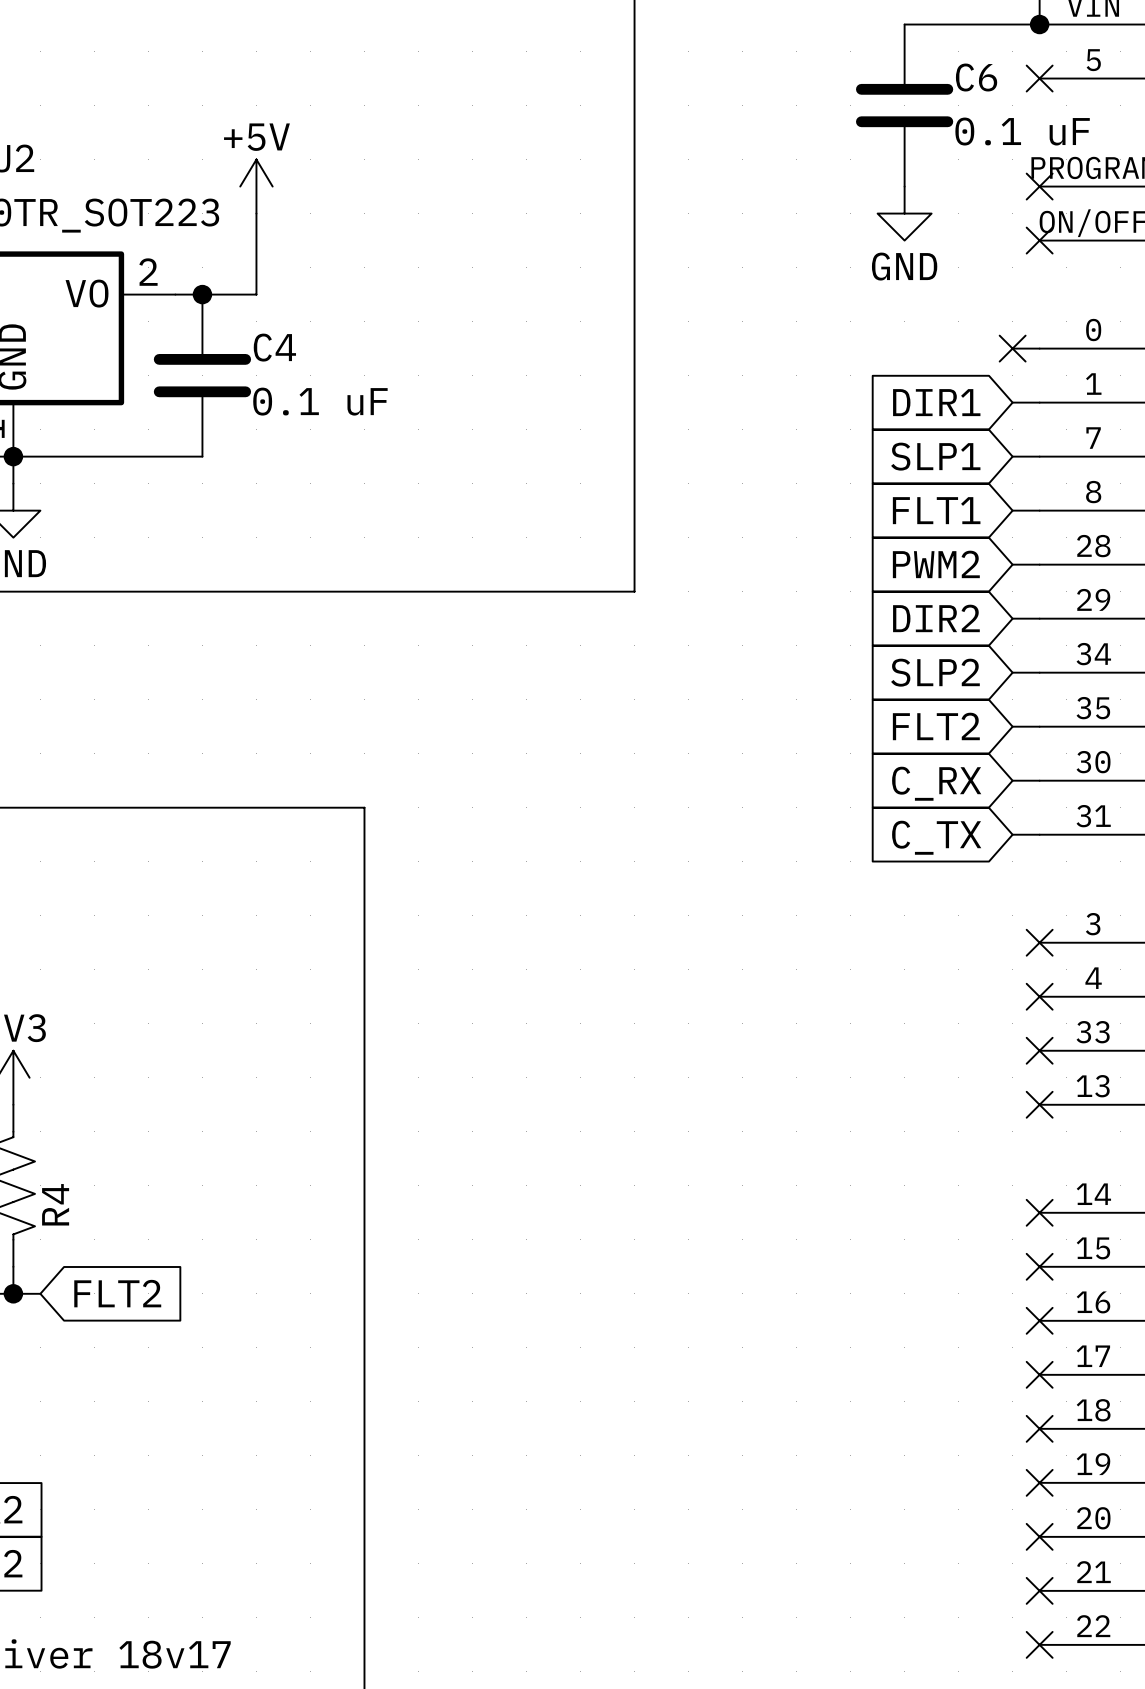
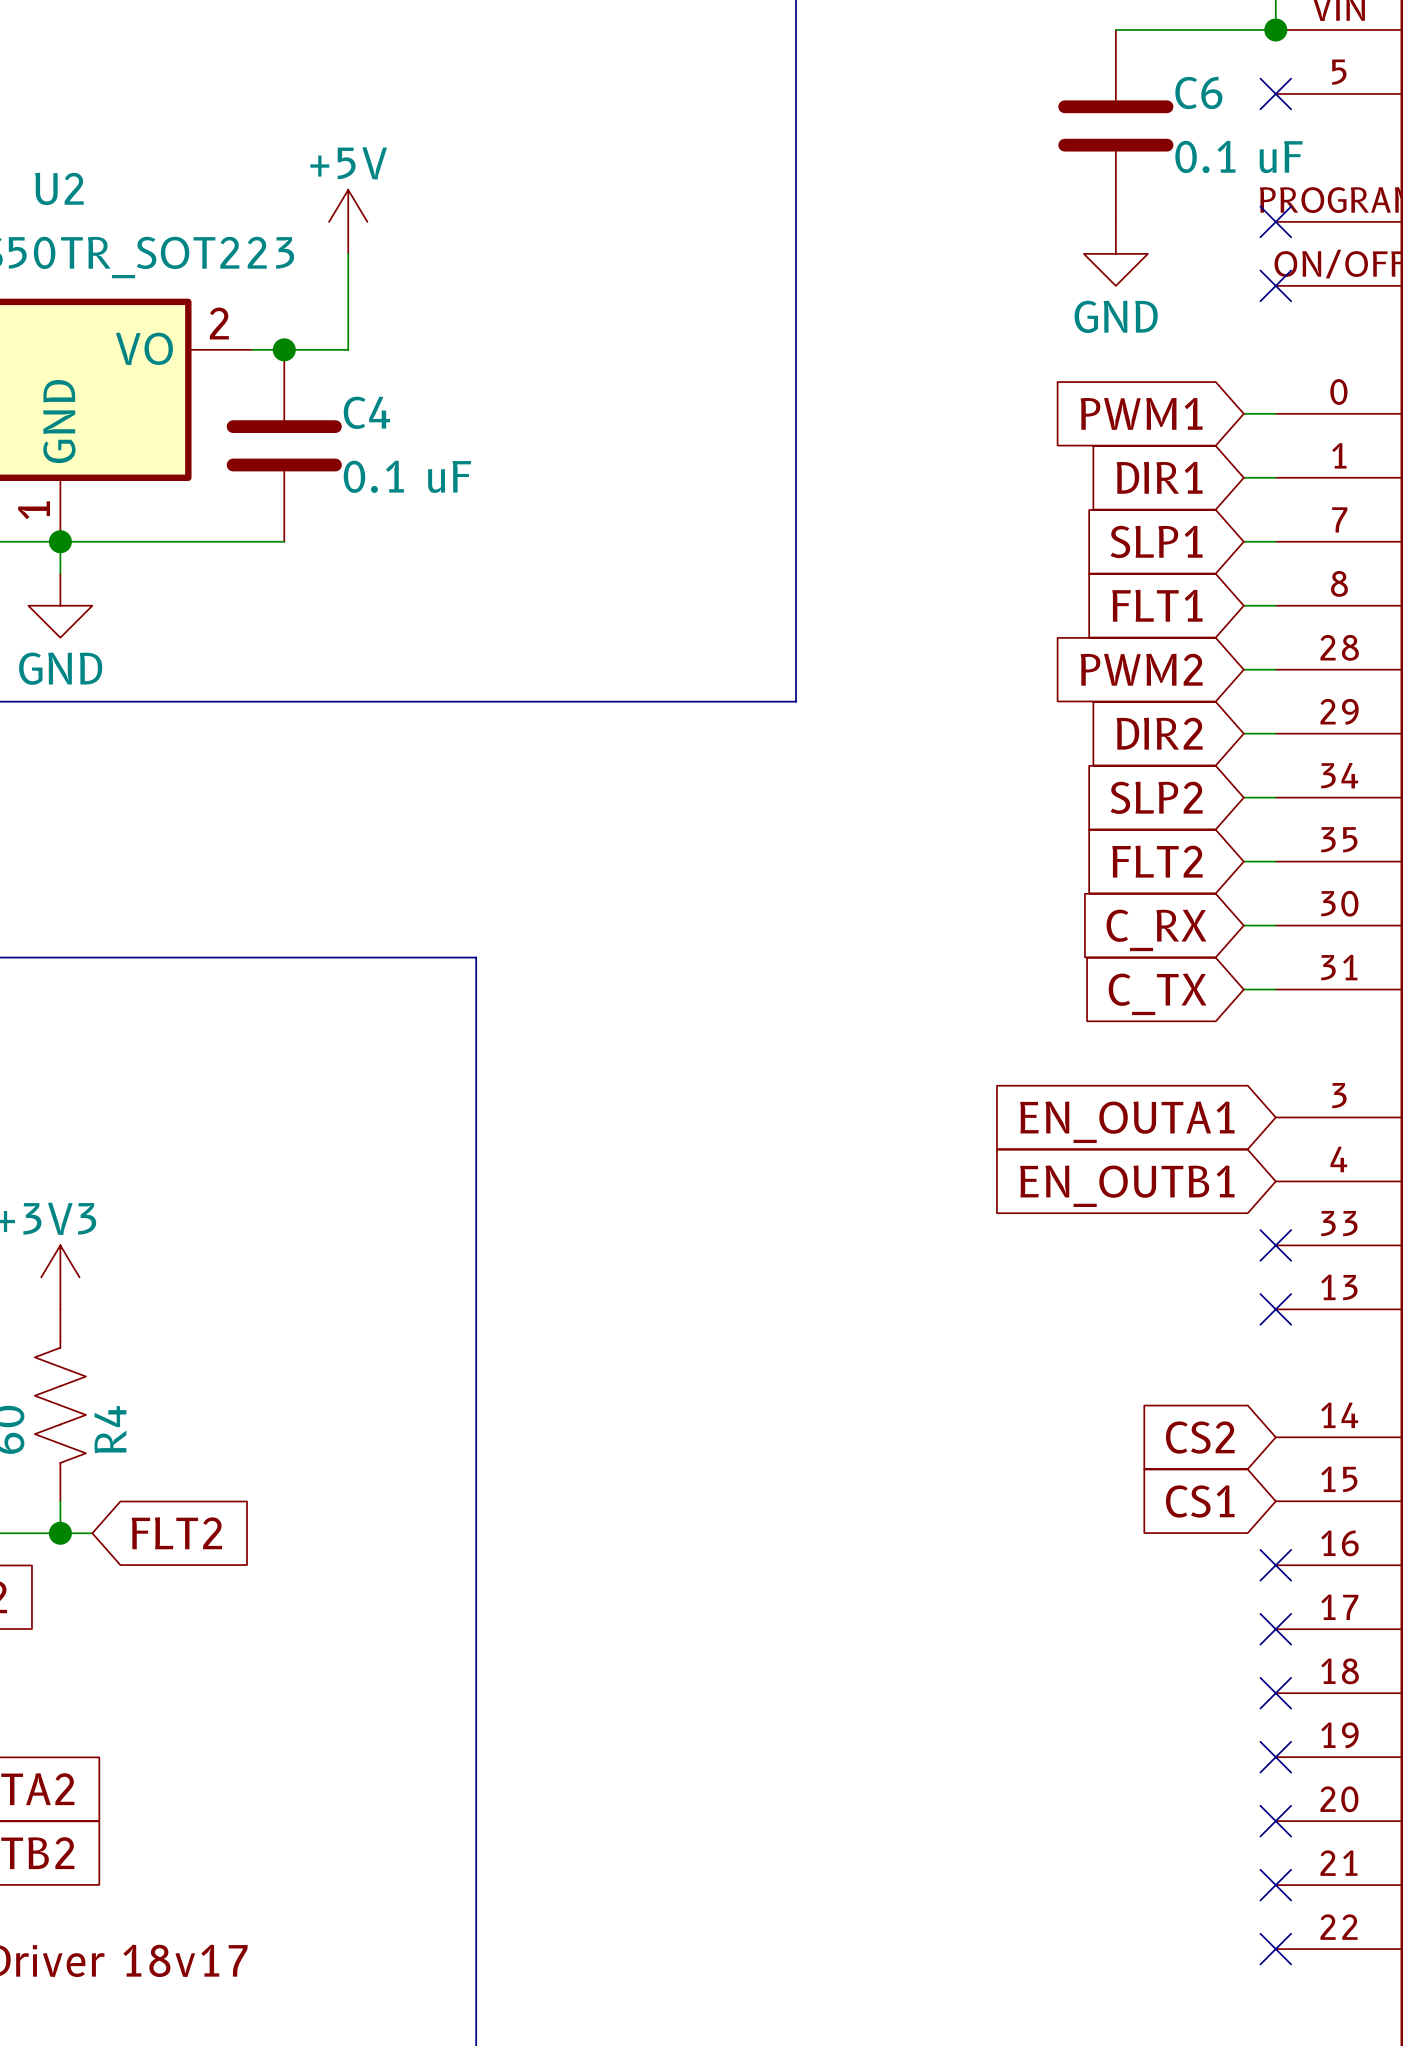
global label: none -> PWM1 (1141, 413)
no-connect mark: (1012, 348) -> none
no-connect mark: (1039, 942) -> none
global label: none -> EN_OUTA1 (1127, 1122)
no-connect mark: (1039, 996) -> none
global label: none -> EN_OUTB1 (1127, 1186)
global label: none -> CS2 (1200, 1437)
no-connect mark: (1039, 1212) -> none
global label: none -> CS1 (1200, 1501)
no-connect mark: (1039, 1266) -> none

